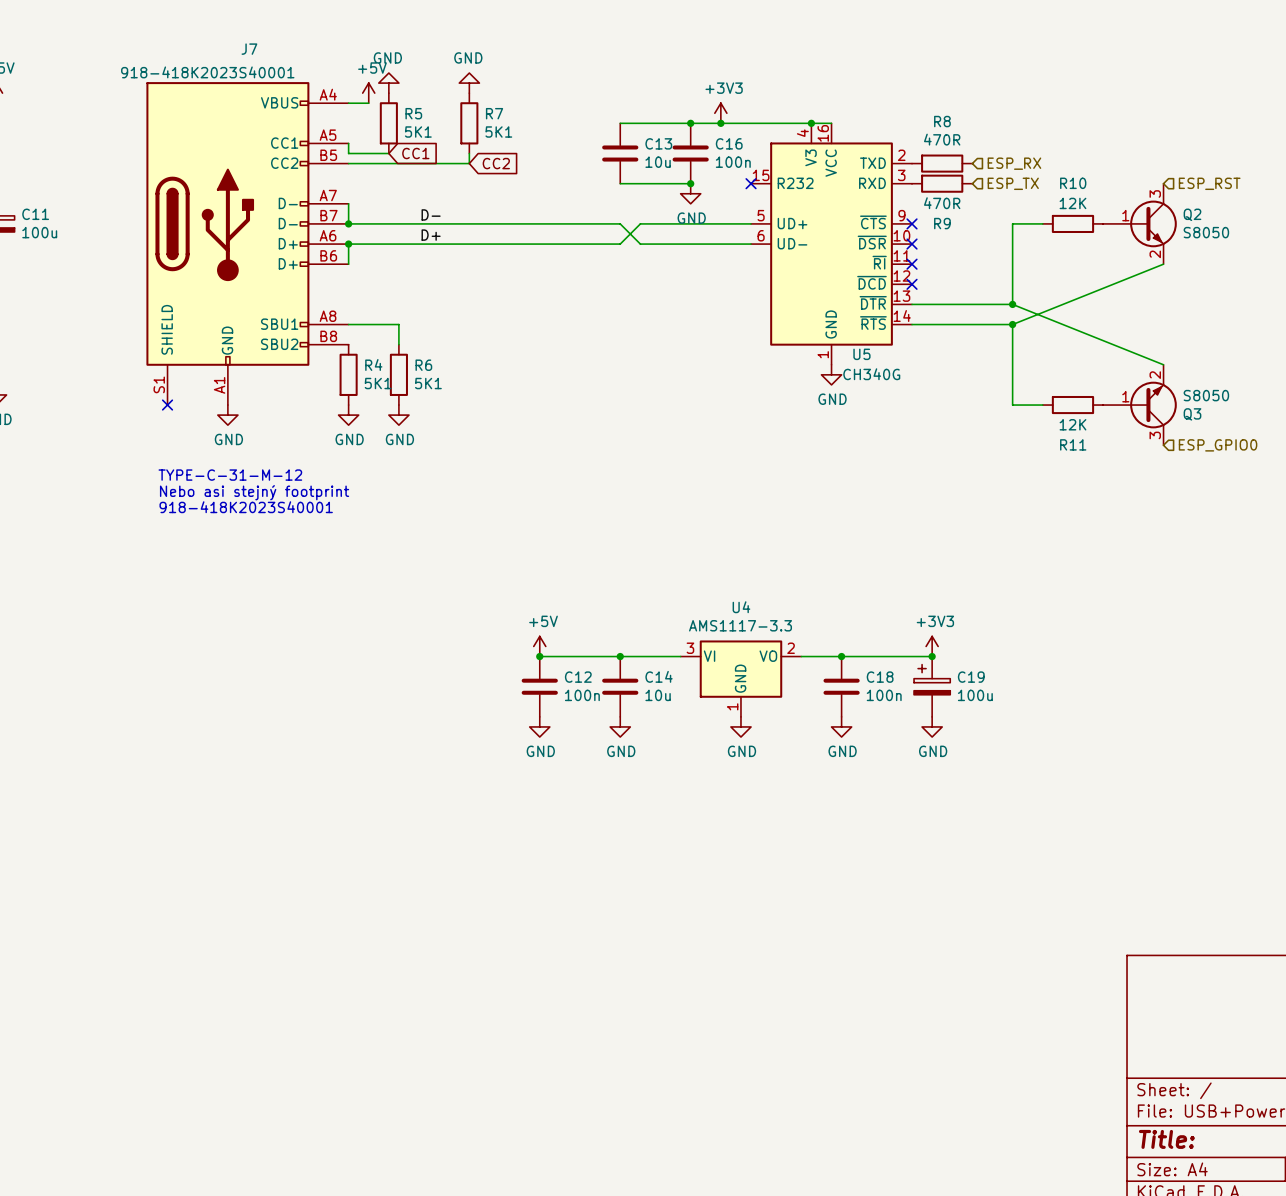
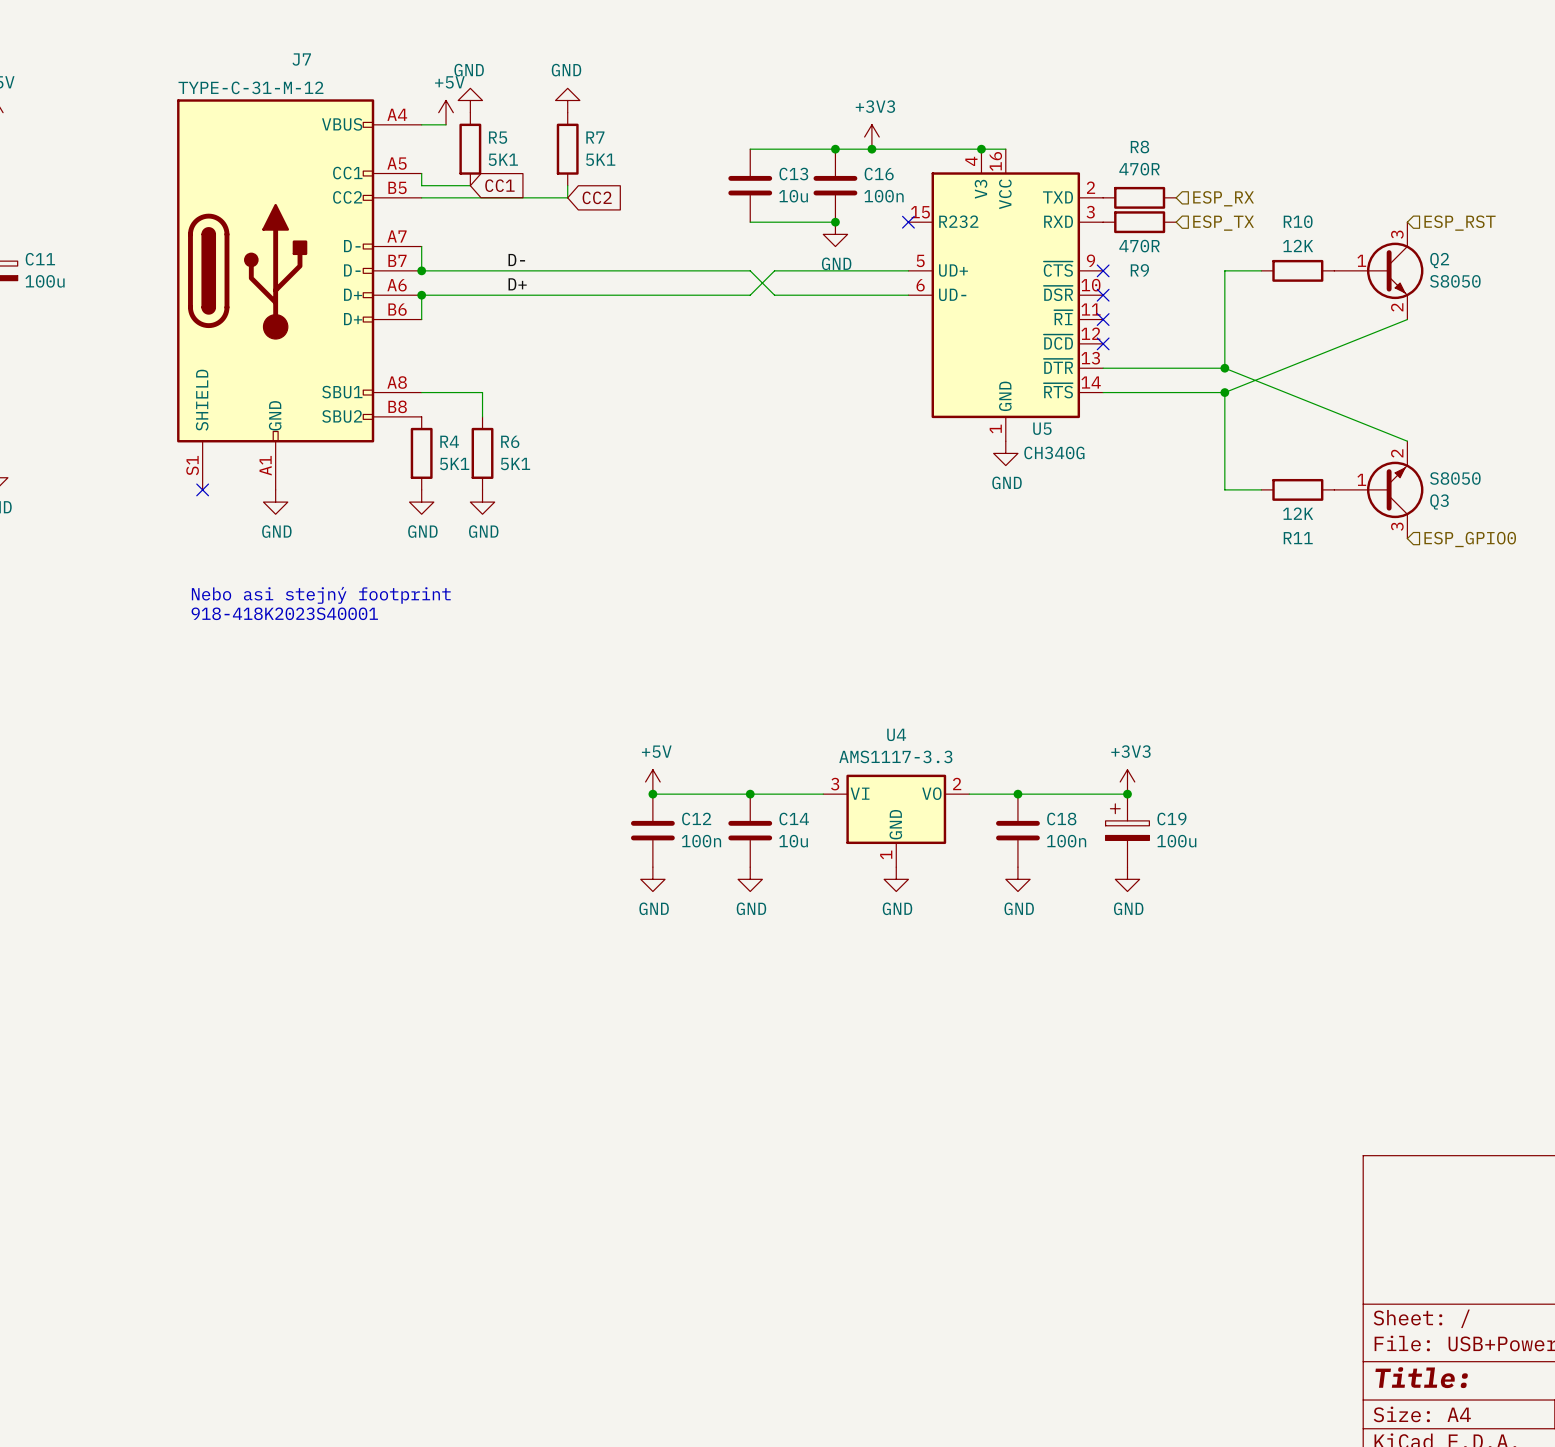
J7 value: 918-418K2023S40001 (207, 72) -> TYPE-C-31-M-12 (250, 87)
text: TYPE-C-31-M-12 (230, 475) -> none

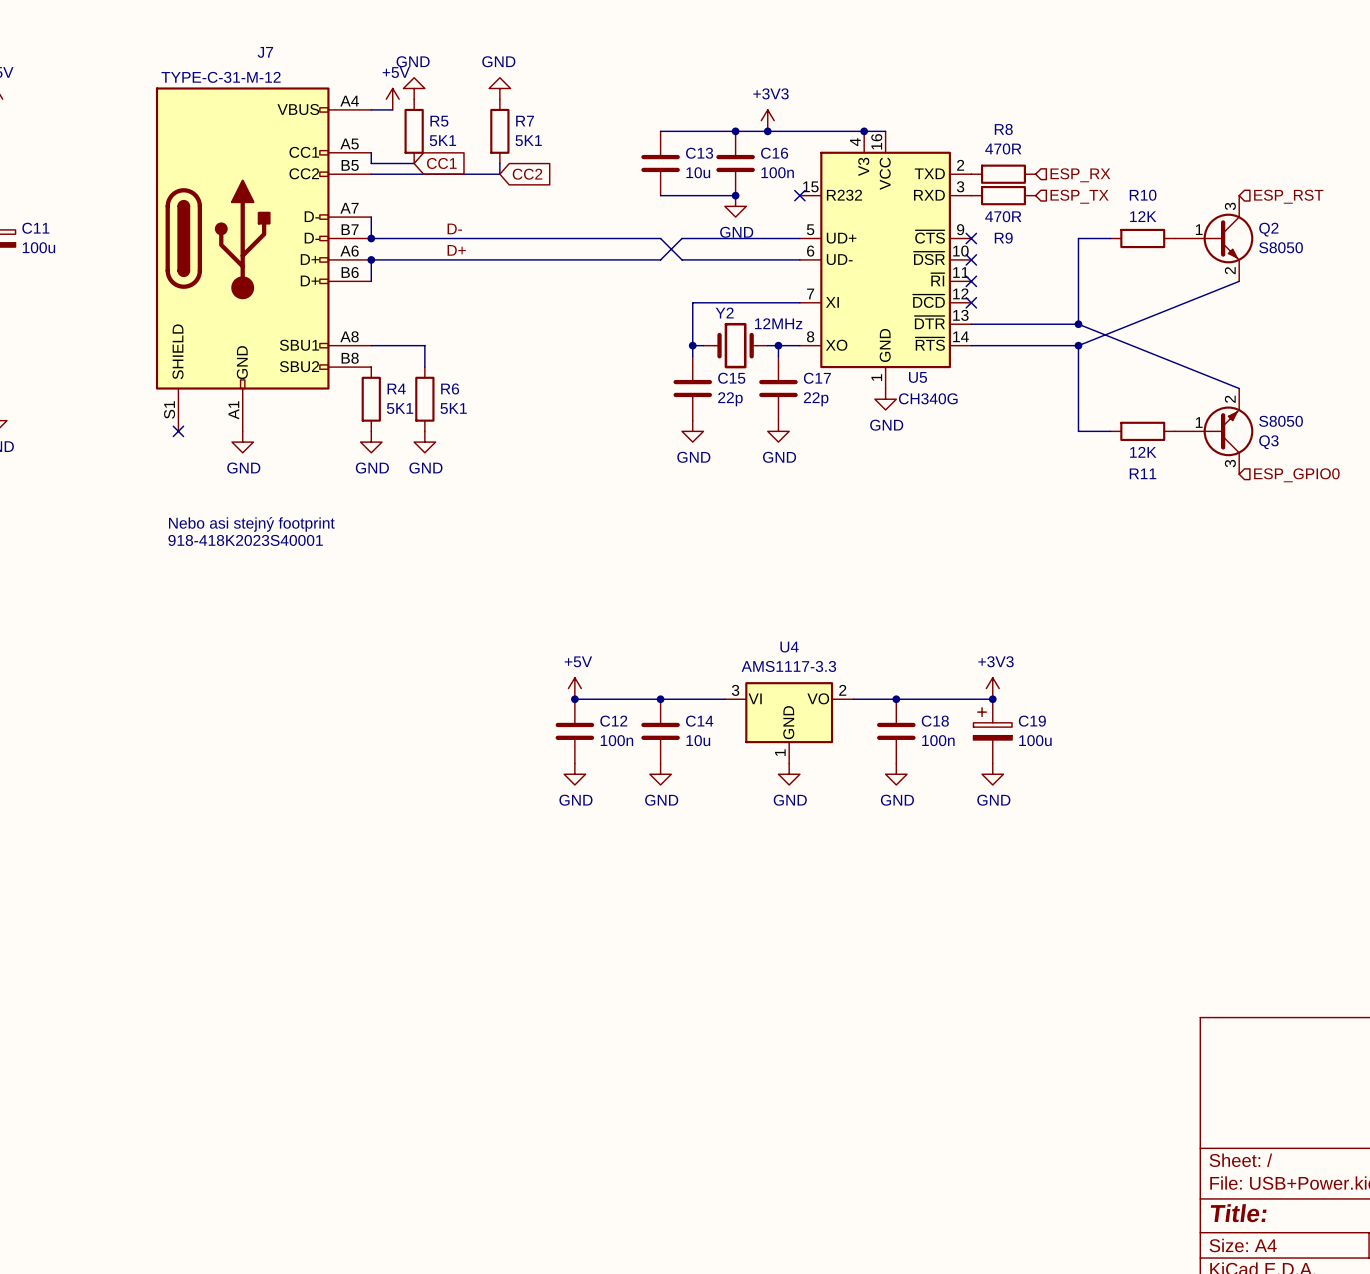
U5 symbol: [908, 149, 1104, 442] -> [799, 131, 972, 389]
wire: none -> (799, 302) (692, 302) (692, 356)
wire: none -> (692, 345) (703, 345)
junction: none -> (692, 345)
Y2: none -> 12MHz (735, 345)
wire: none -> (767, 345) (799, 345)
wire: none -> (778, 345) (778, 356)
junction: none -> (778, 345)
C15: none -> 22p (692, 388)
C17: none -> 22p (778, 388)
power symbol: none -> GND (692, 431)
power symbol: none -> GND (778, 431)

